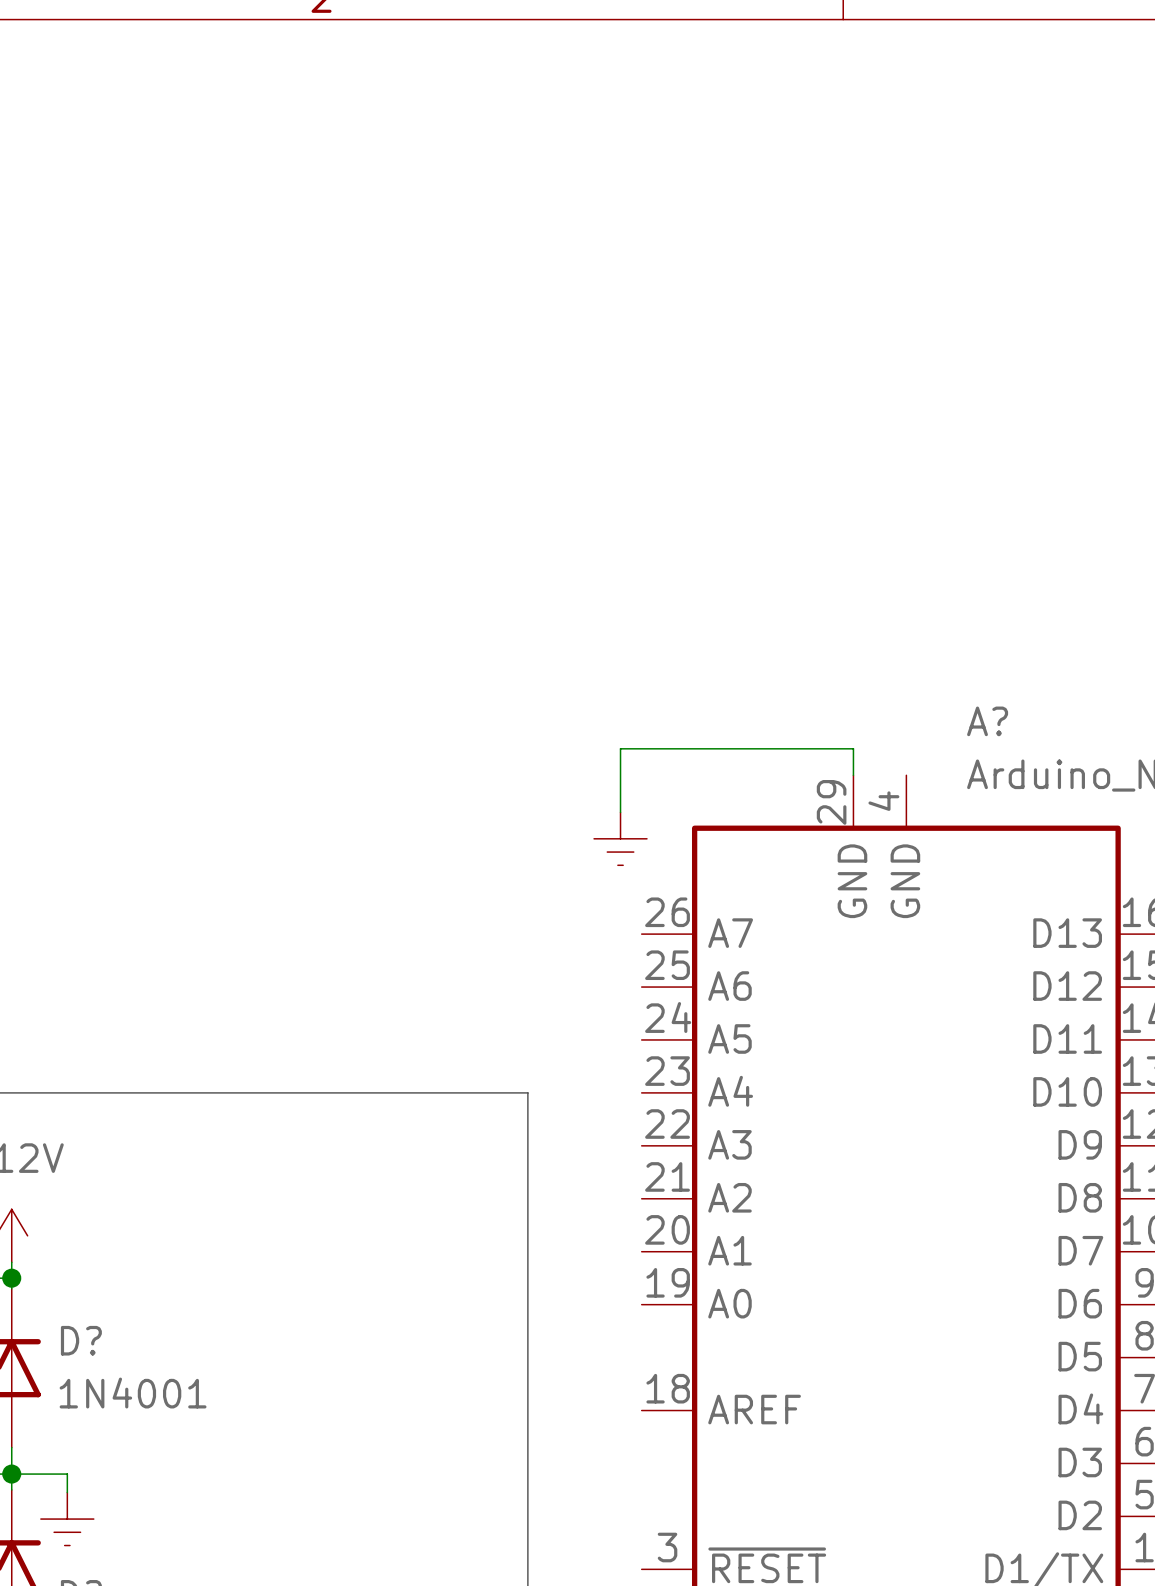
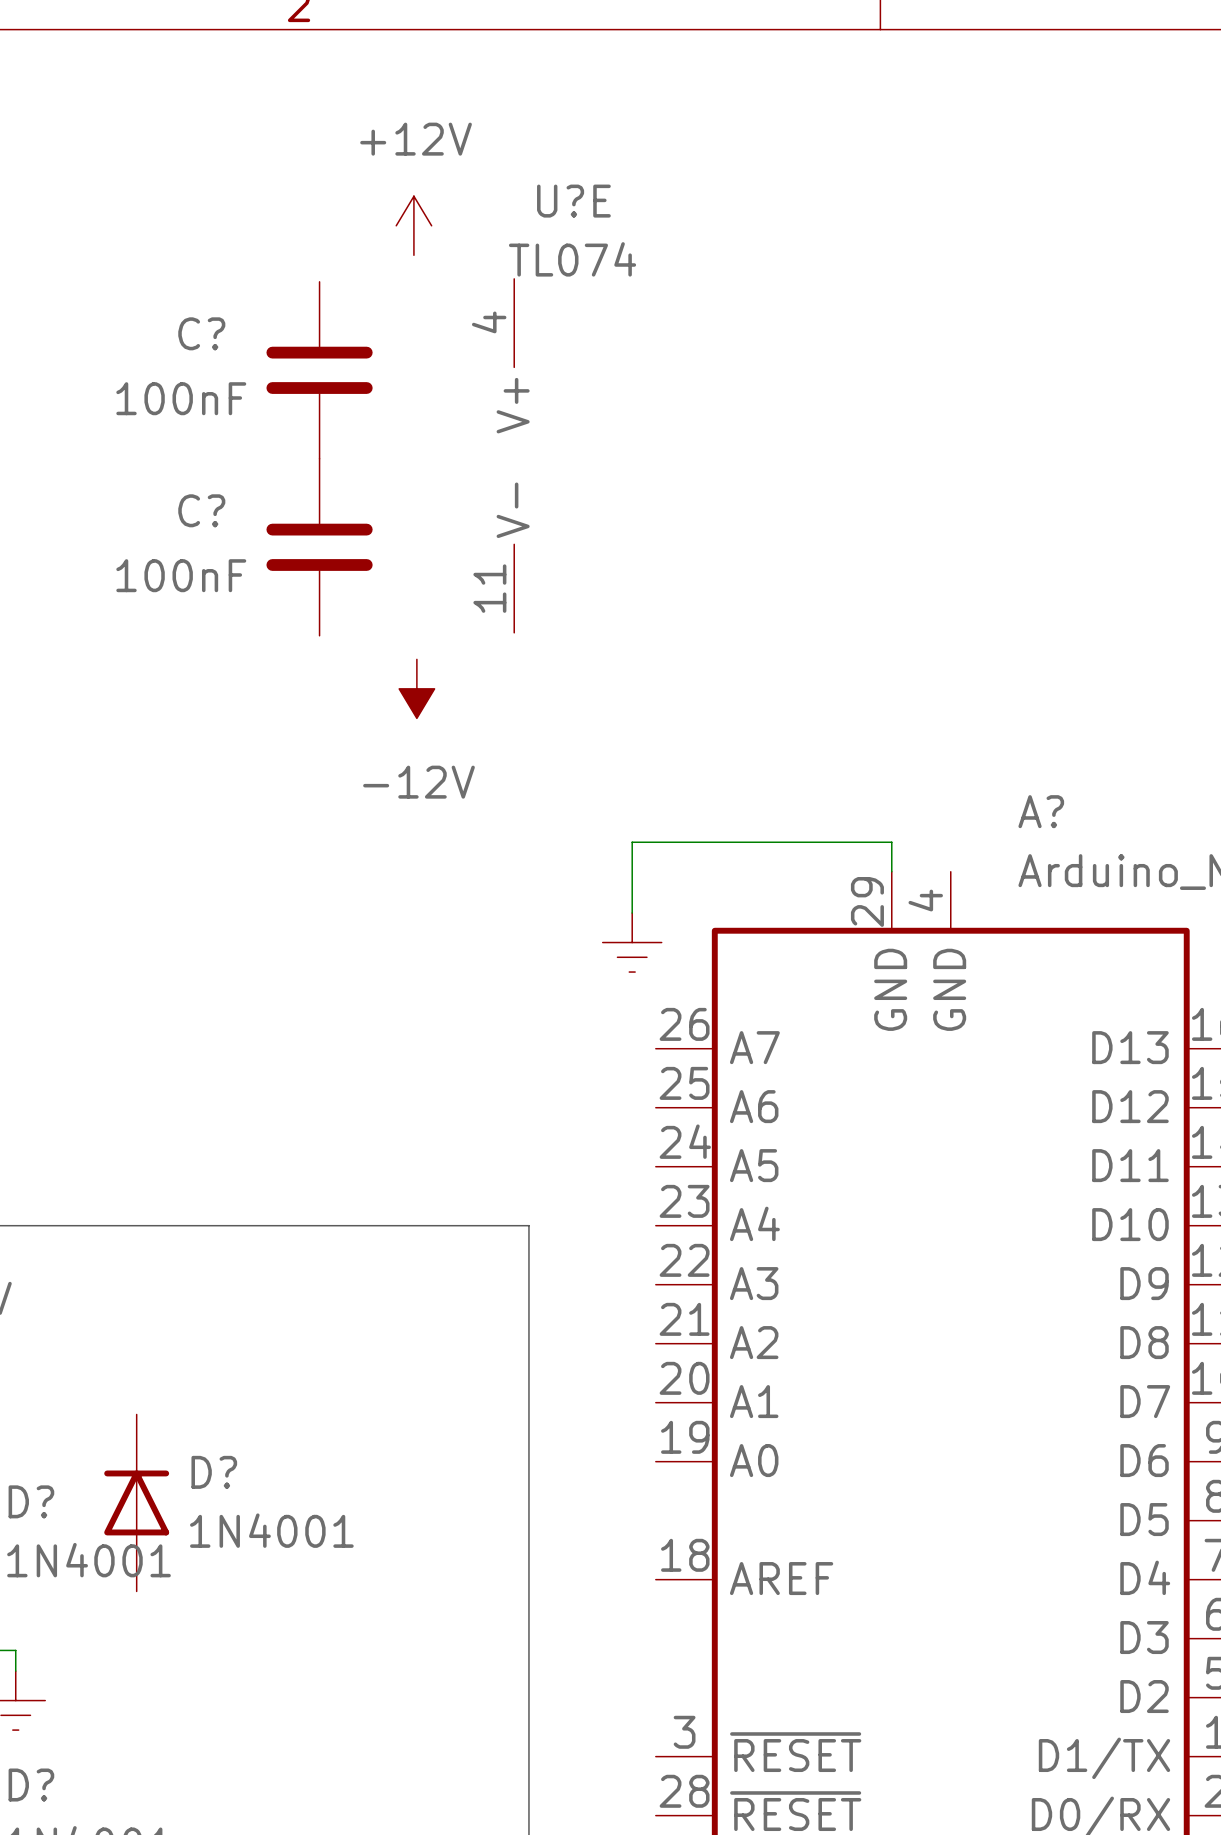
power symbol: none -> +12V (413, 225)
C?: none -> 100nF (319, 370)
U?E: none -> TL074 (514, 455)
C?: none -> 100nF (319, 547)
power symbol: none -> -12V (416, 688)
D?: none -> 1N4001 (136, 1502)

